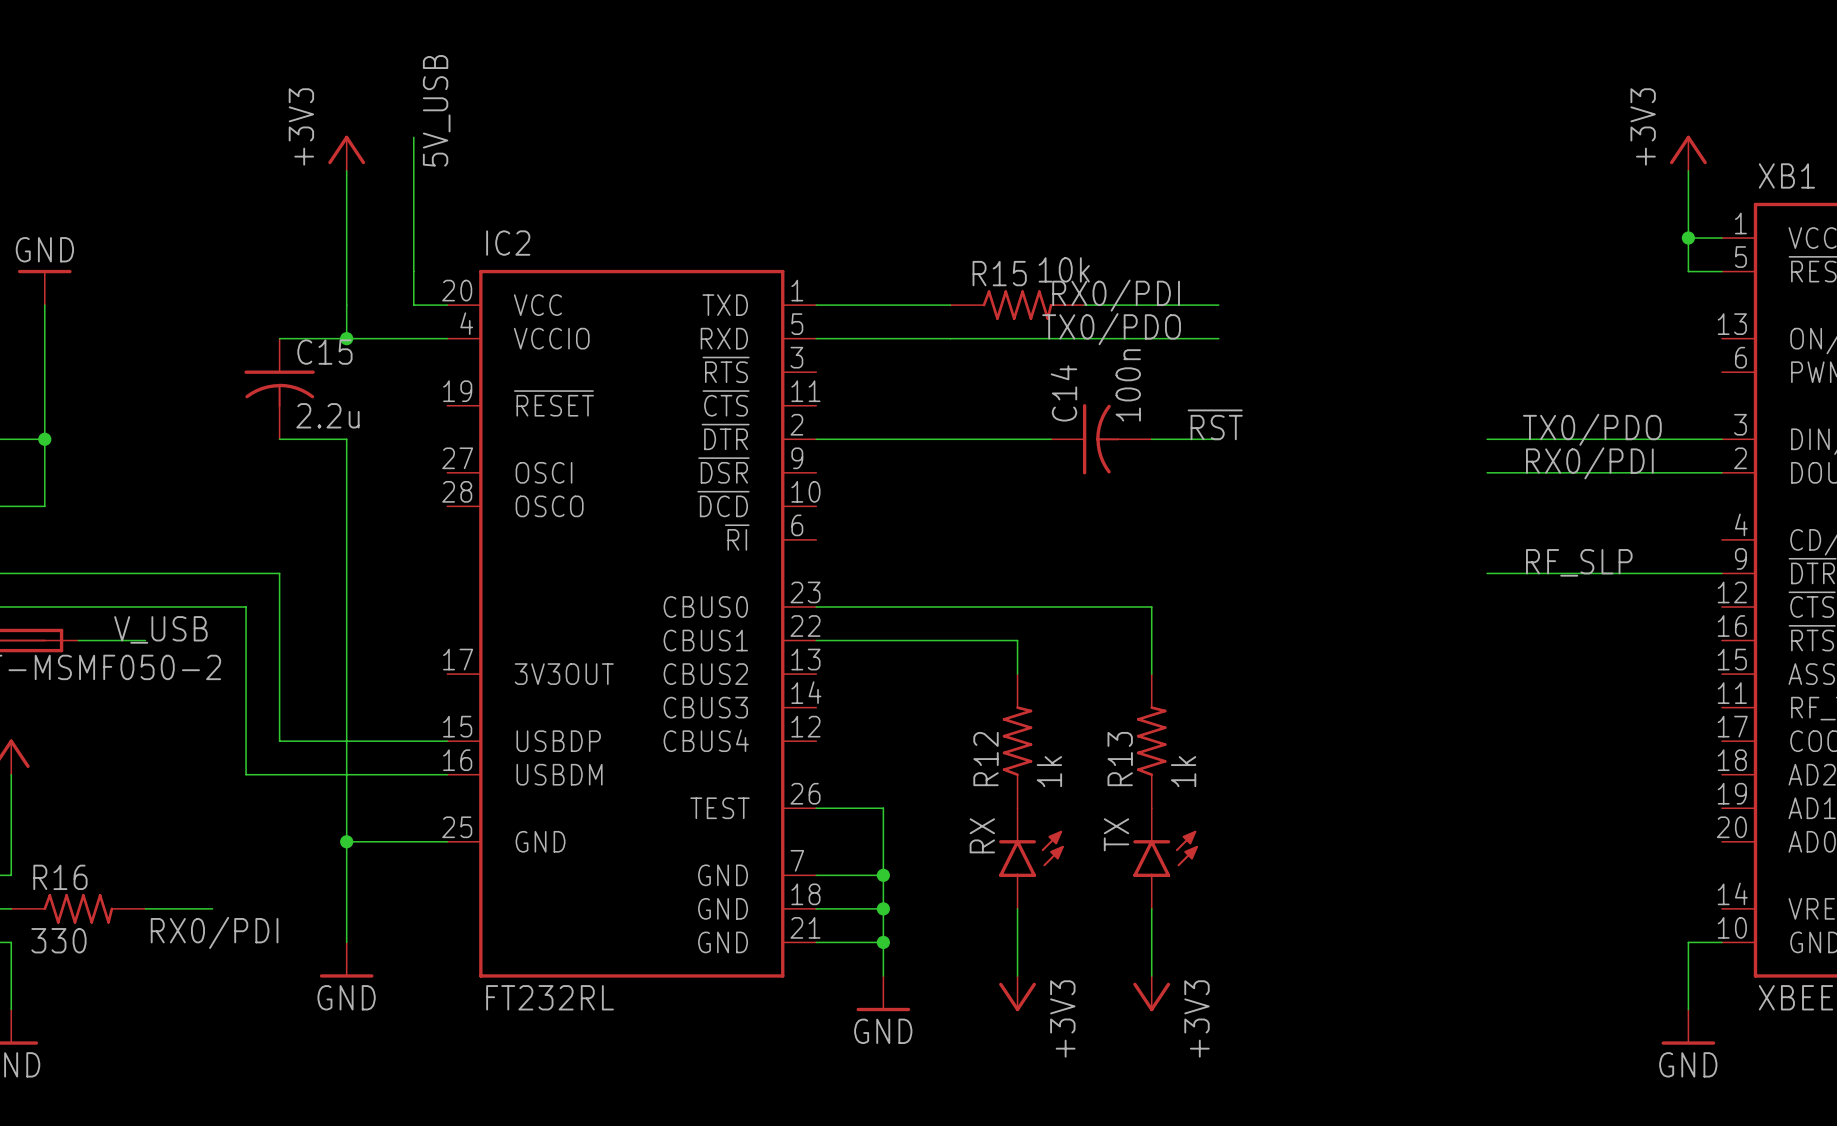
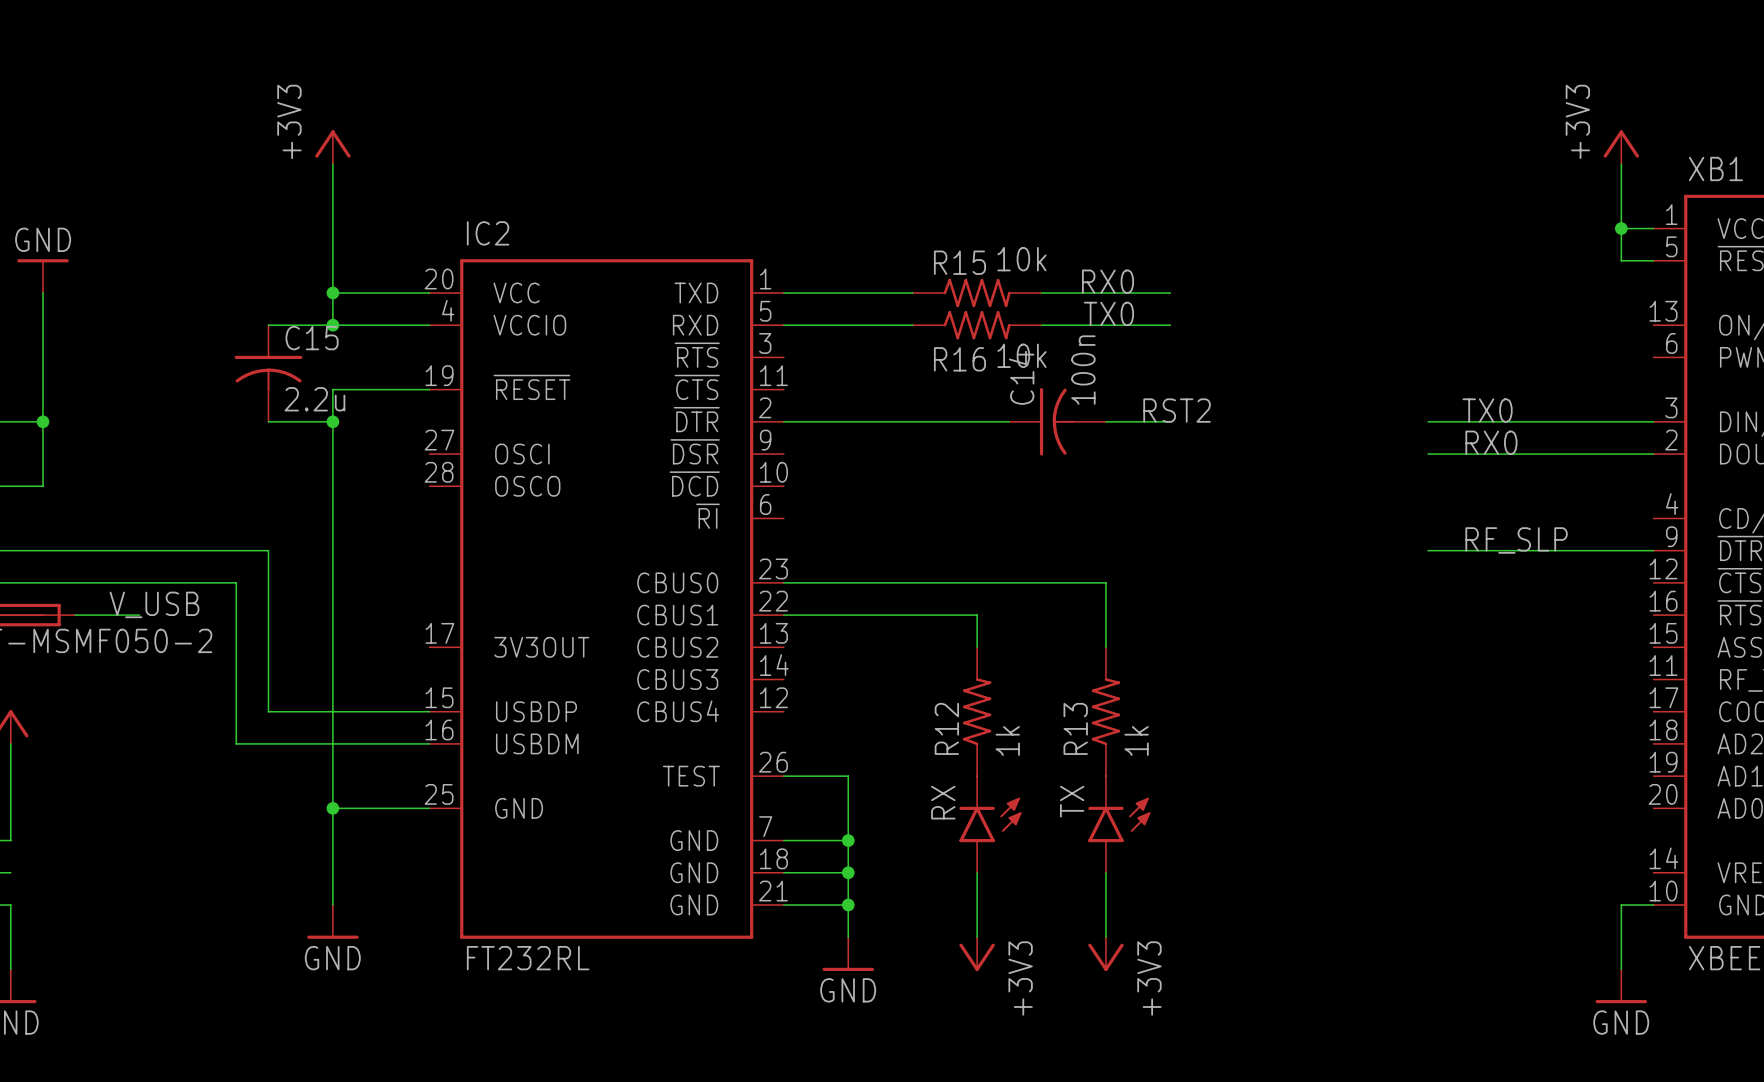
label: 5V_USB (436, 110) -> none
wire: (413, 137) (413, 305) -> (332, 292) (397, 292)
label: RX0/PDI (1116, 295) -> RX0 (1108, 281)
junction: none -> (332, 292)
label: TX0/PDO (1111, 329) -> TX0 (1108, 313)
wire: none -> (429, 389) (332, 389) (332, 421)
label: ~{RST} (1215, 424) -> RST2 (1177, 410)
label: TX0/PDO (1592, 429) -> TX0 (1487, 410)
junction: none -> (332, 421)
label: RX0/PDI (1589, 463) -> RX0 (1491, 442)
R16 name position: R16 (60, 877) -> R16 (959, 359)
R16 position: (78, 908) -> (977, 325)
wire: (145, 908) (212, 908) -> none
label: RX0/PDI (214, 932) -> none
R16 value: 330 (58, 940) -> 10k (1021, 355)

